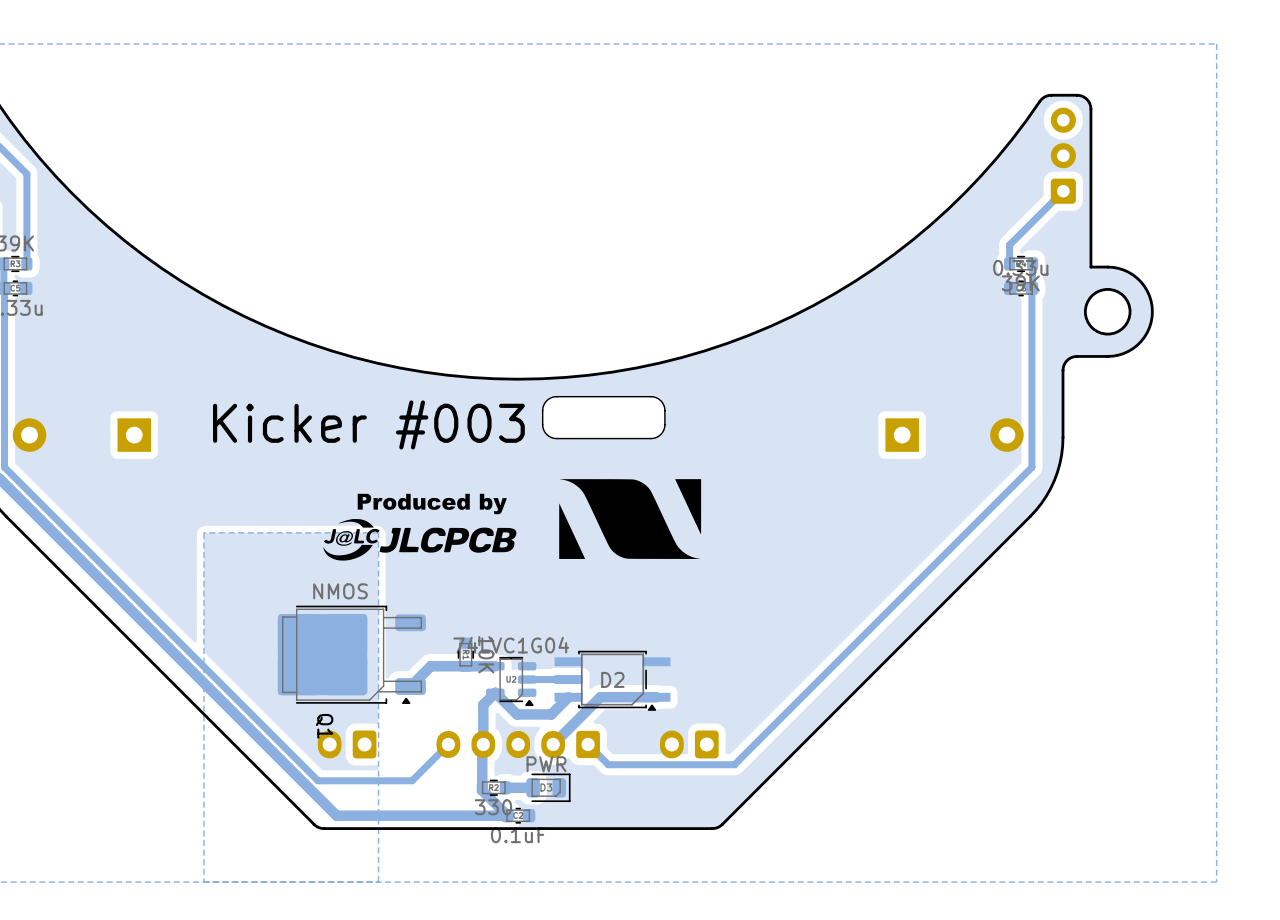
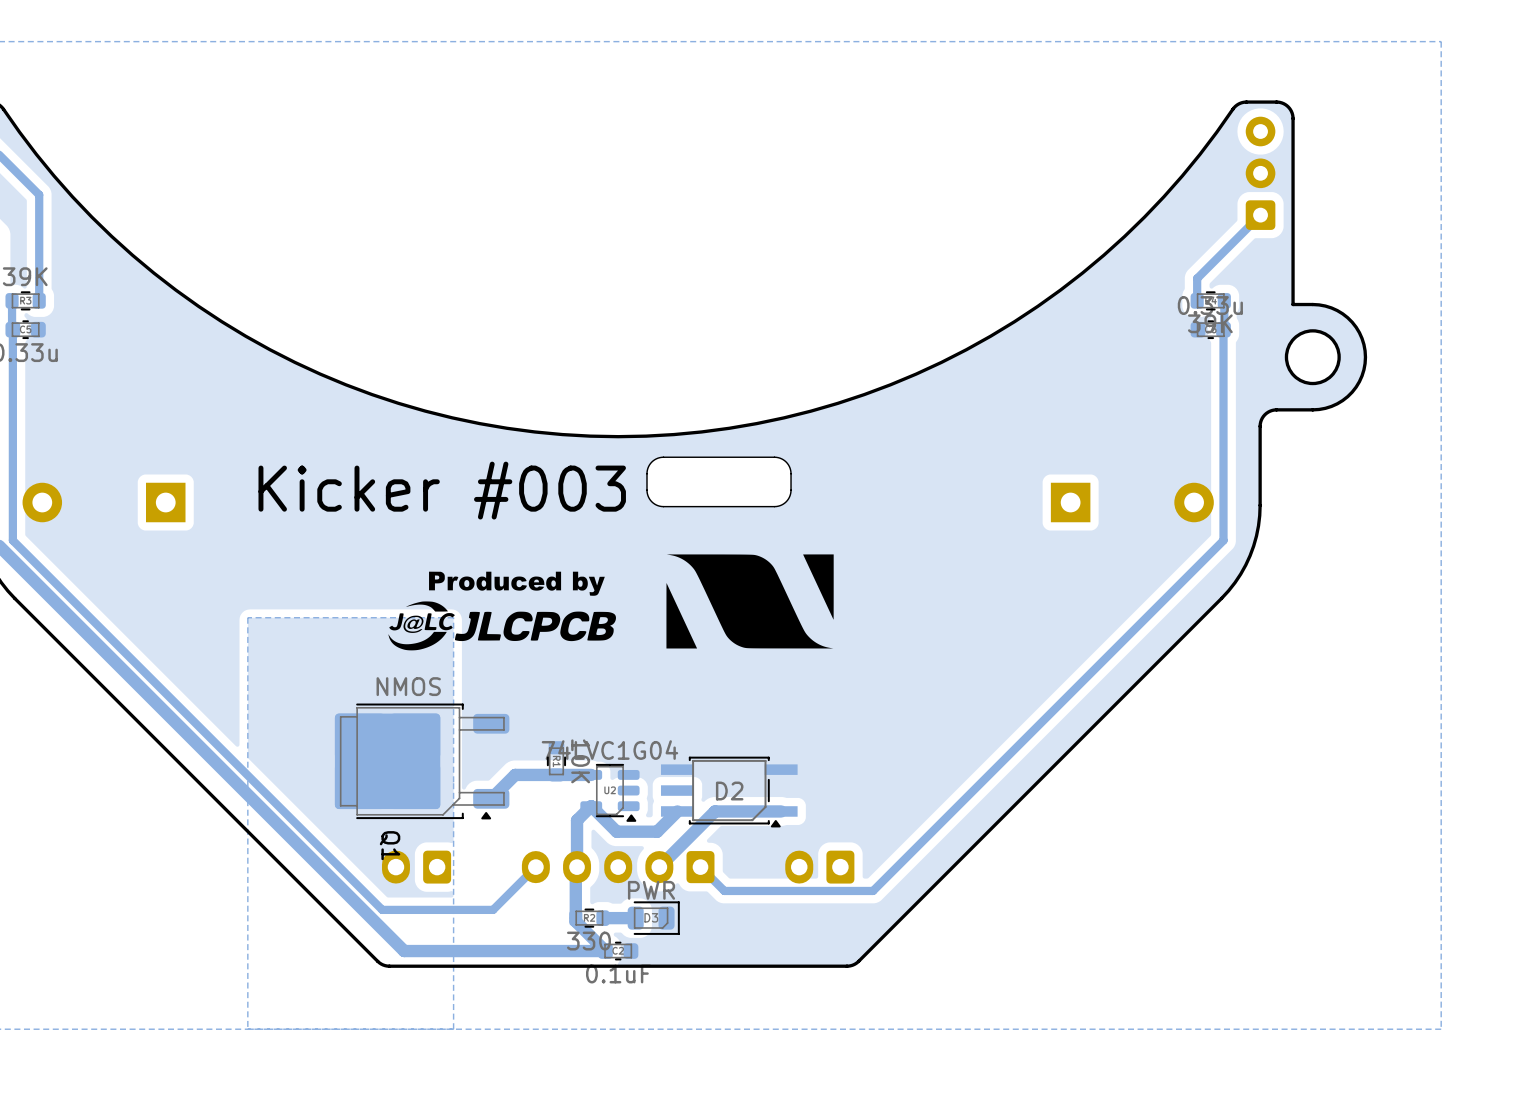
track: (568, 679) (527, 679) -> none

